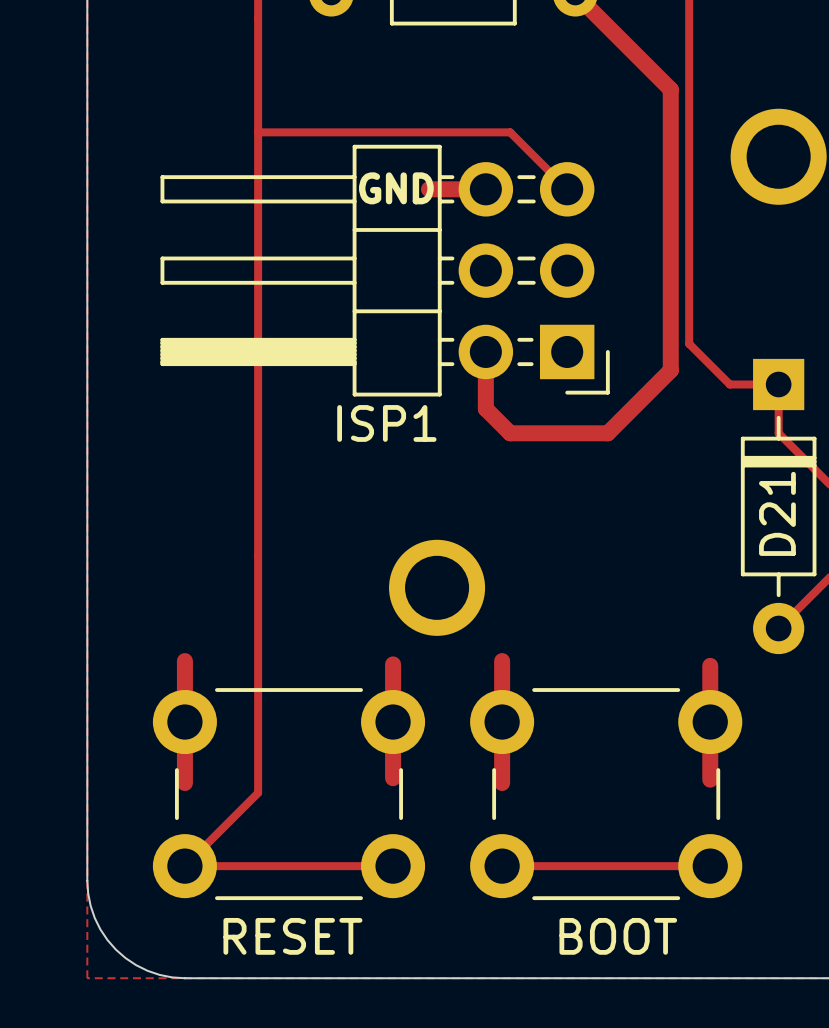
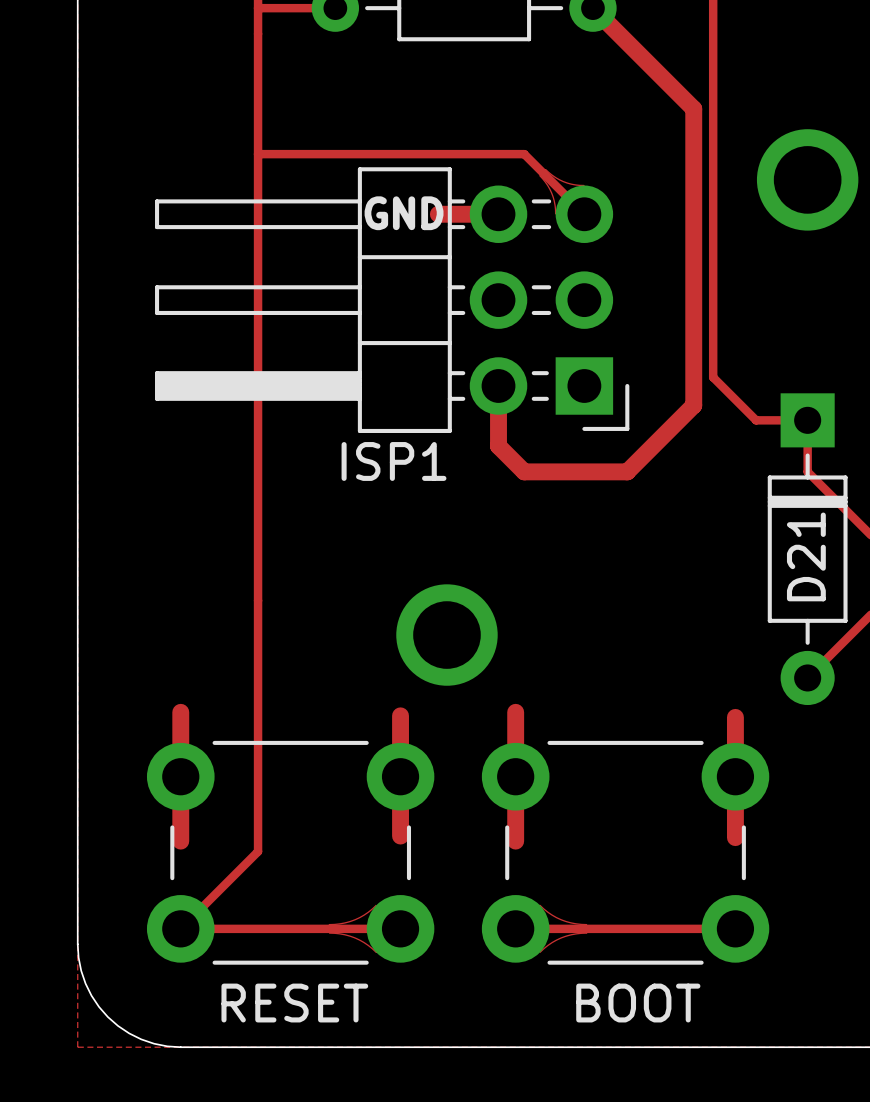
zone outline: none -> (545, 169) (563, 181) (584, 185) (594, 224) (555, 213) (551, 193) (539, 175) (545, 169)
zone outline: none -> (376, 905) (417, 928) (376, 952) (355, 937) (329, 933) (329, 924) (355, 919) (376, 905)
zone outline: none -> (539, 905) (561, 919) (587, 924) (587, 933) (561, 937) (539, 952) (498, 928) (539, 905)

